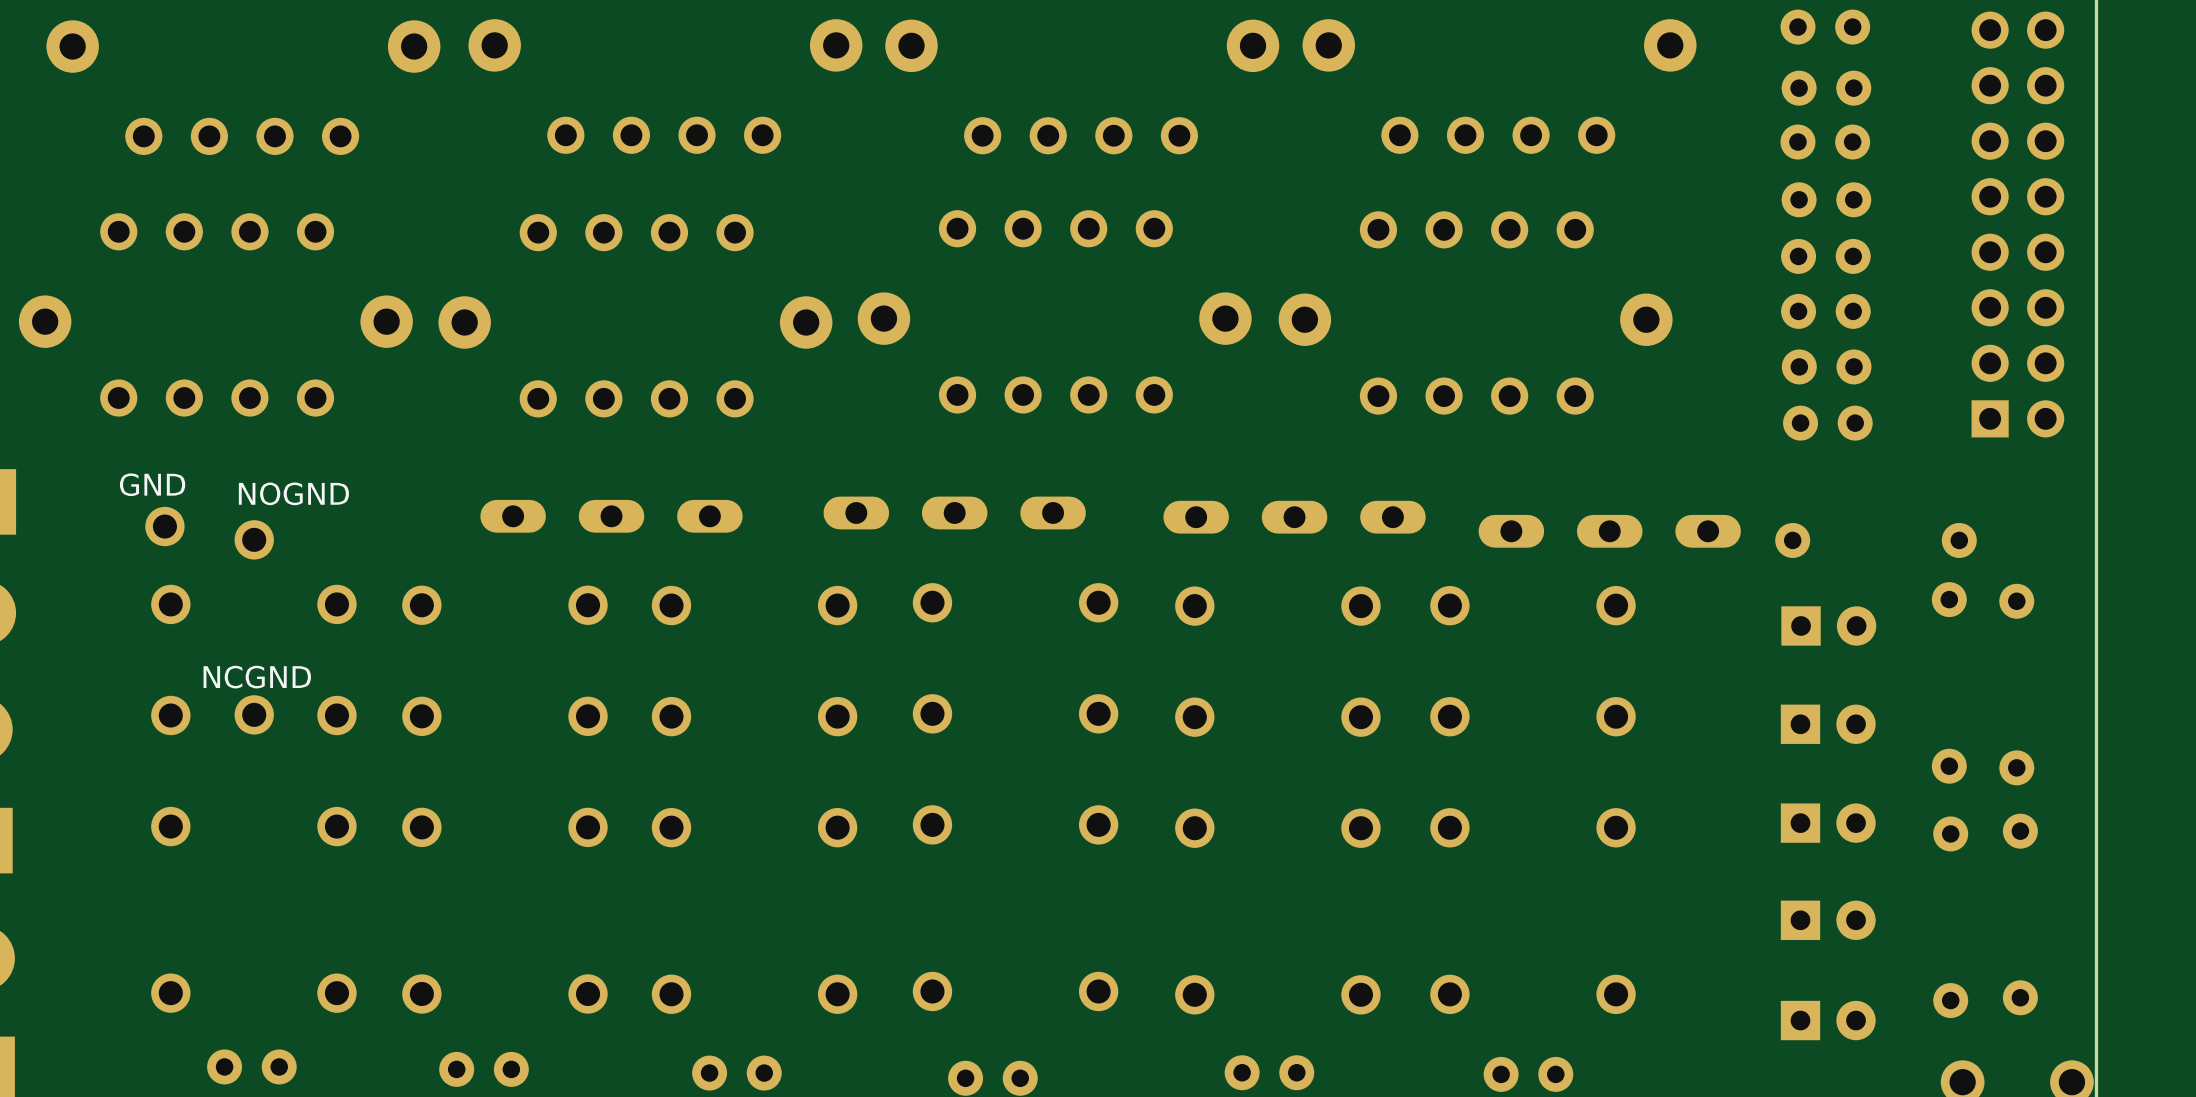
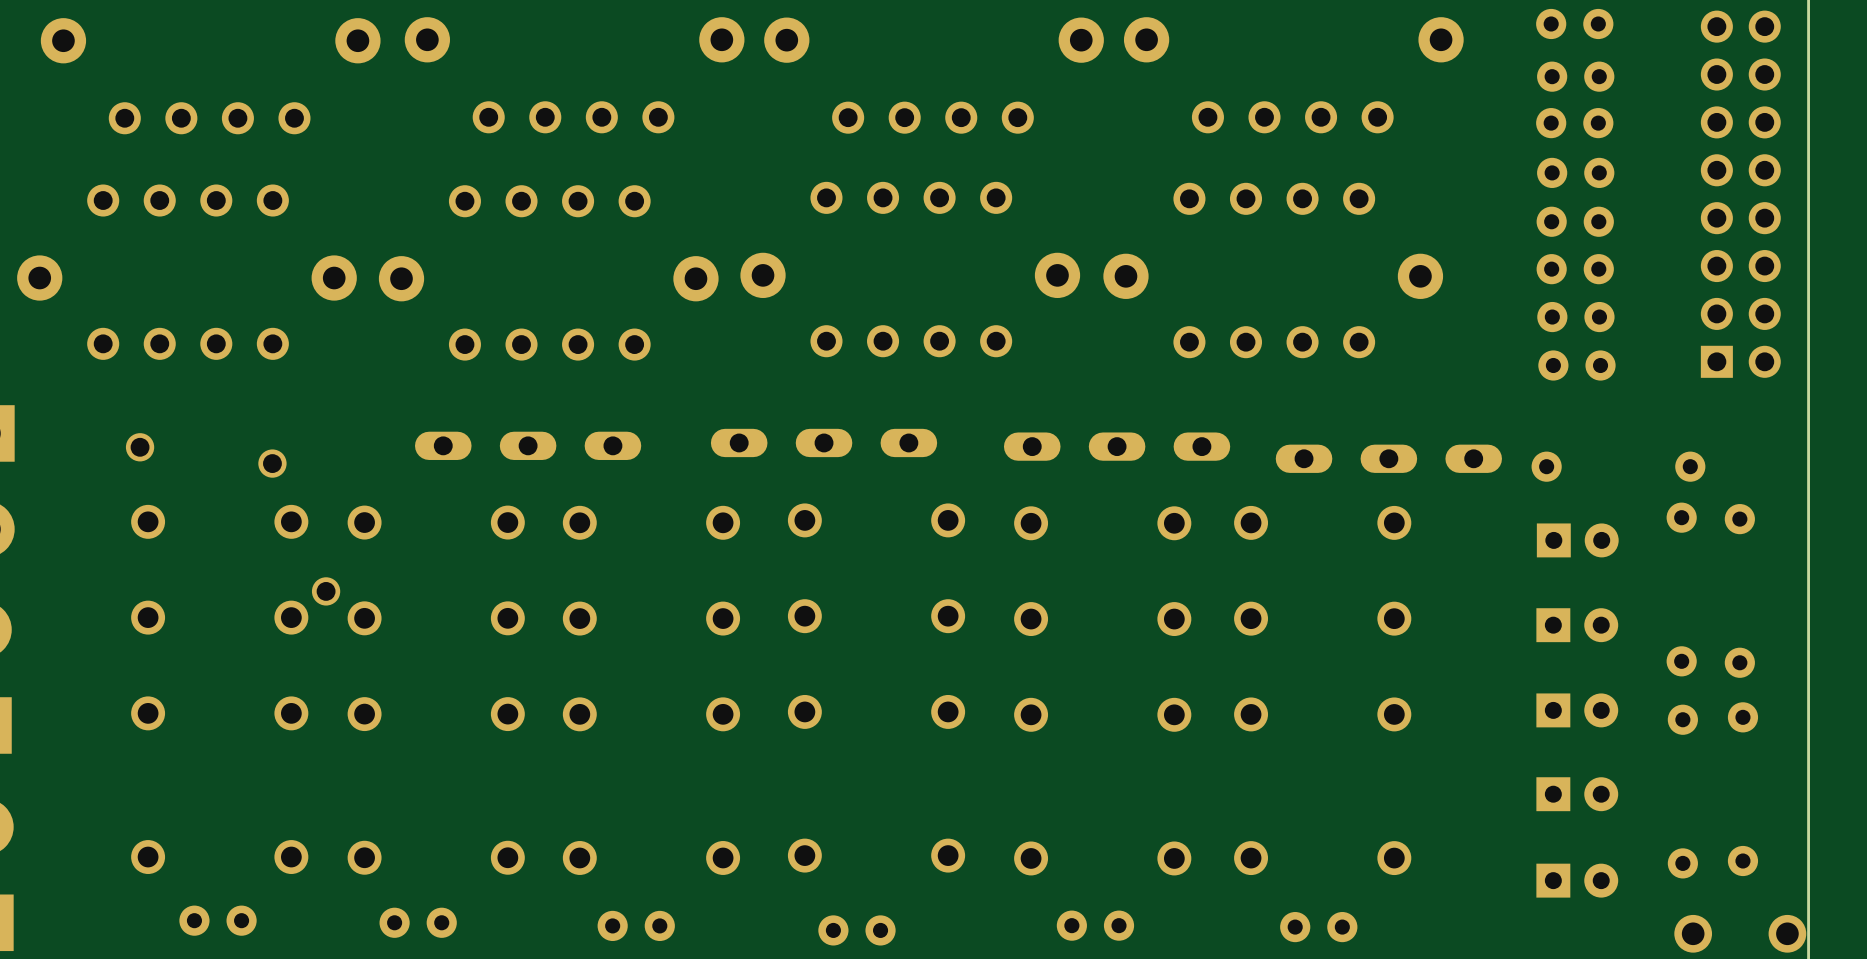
text: GND (152, 484) -> none
text: NOGND (293, 493) -> none
part footprint: [145, 506, 185, 547] -> [125, 433, 155, 462]
part: none -> (272, 463)
part: (254, 539) -> none
text: NCGND (257, 677) -> none
part: none -> (326, 591)
part: (254, 714) -> none

